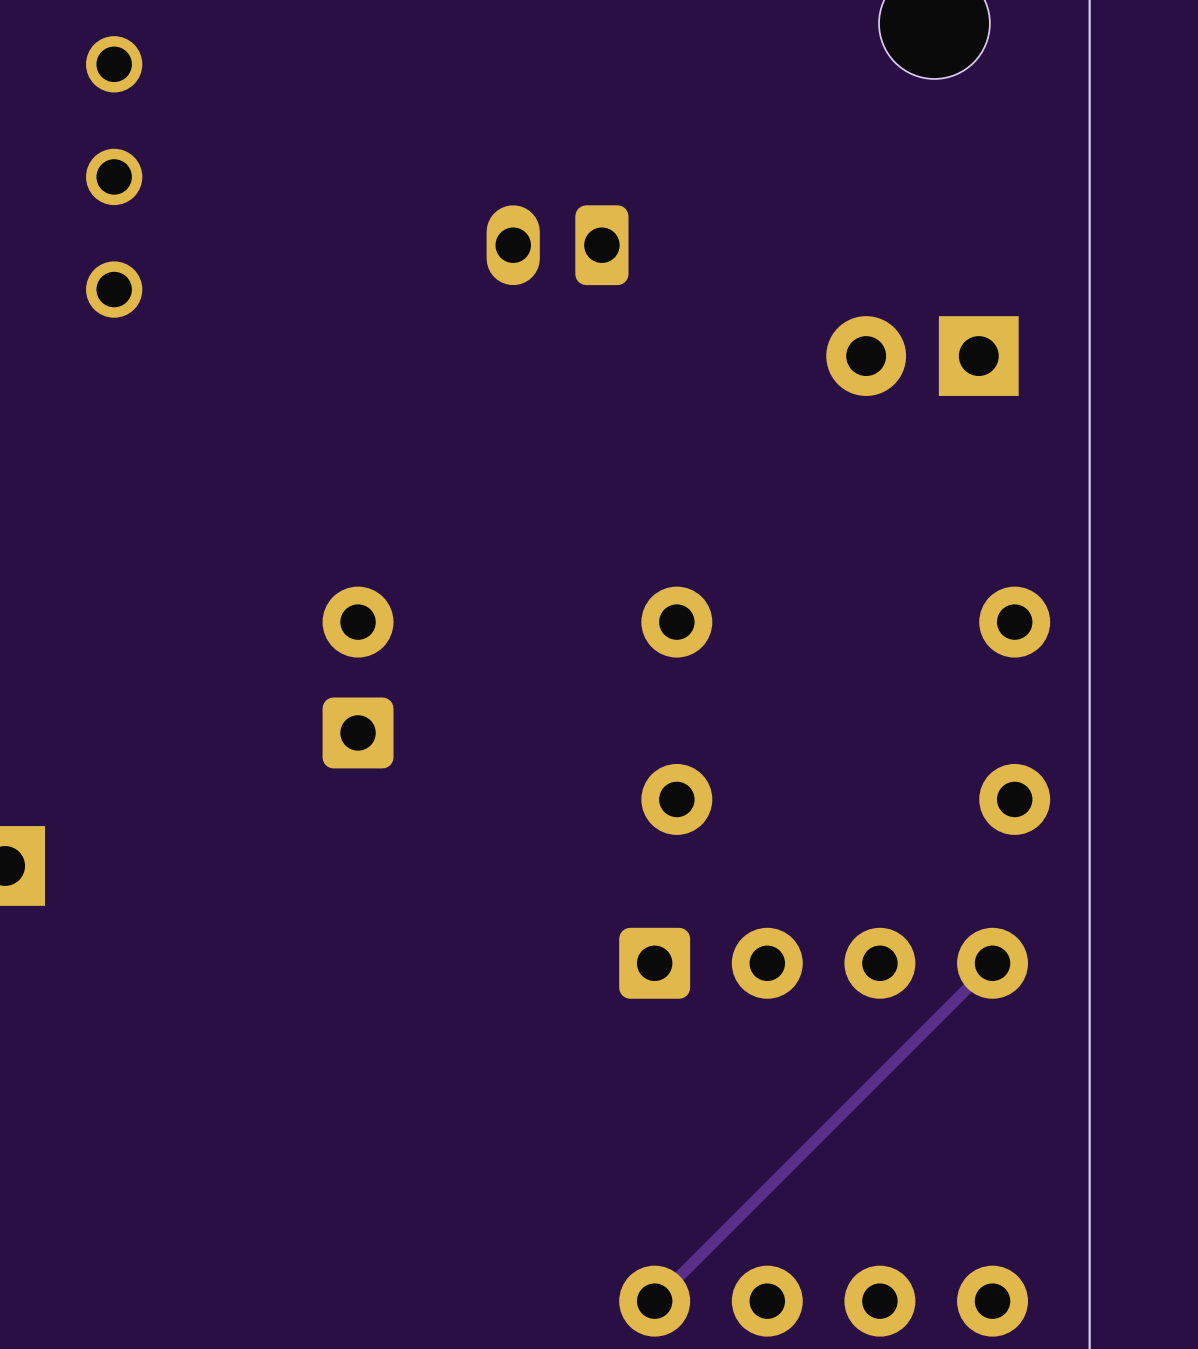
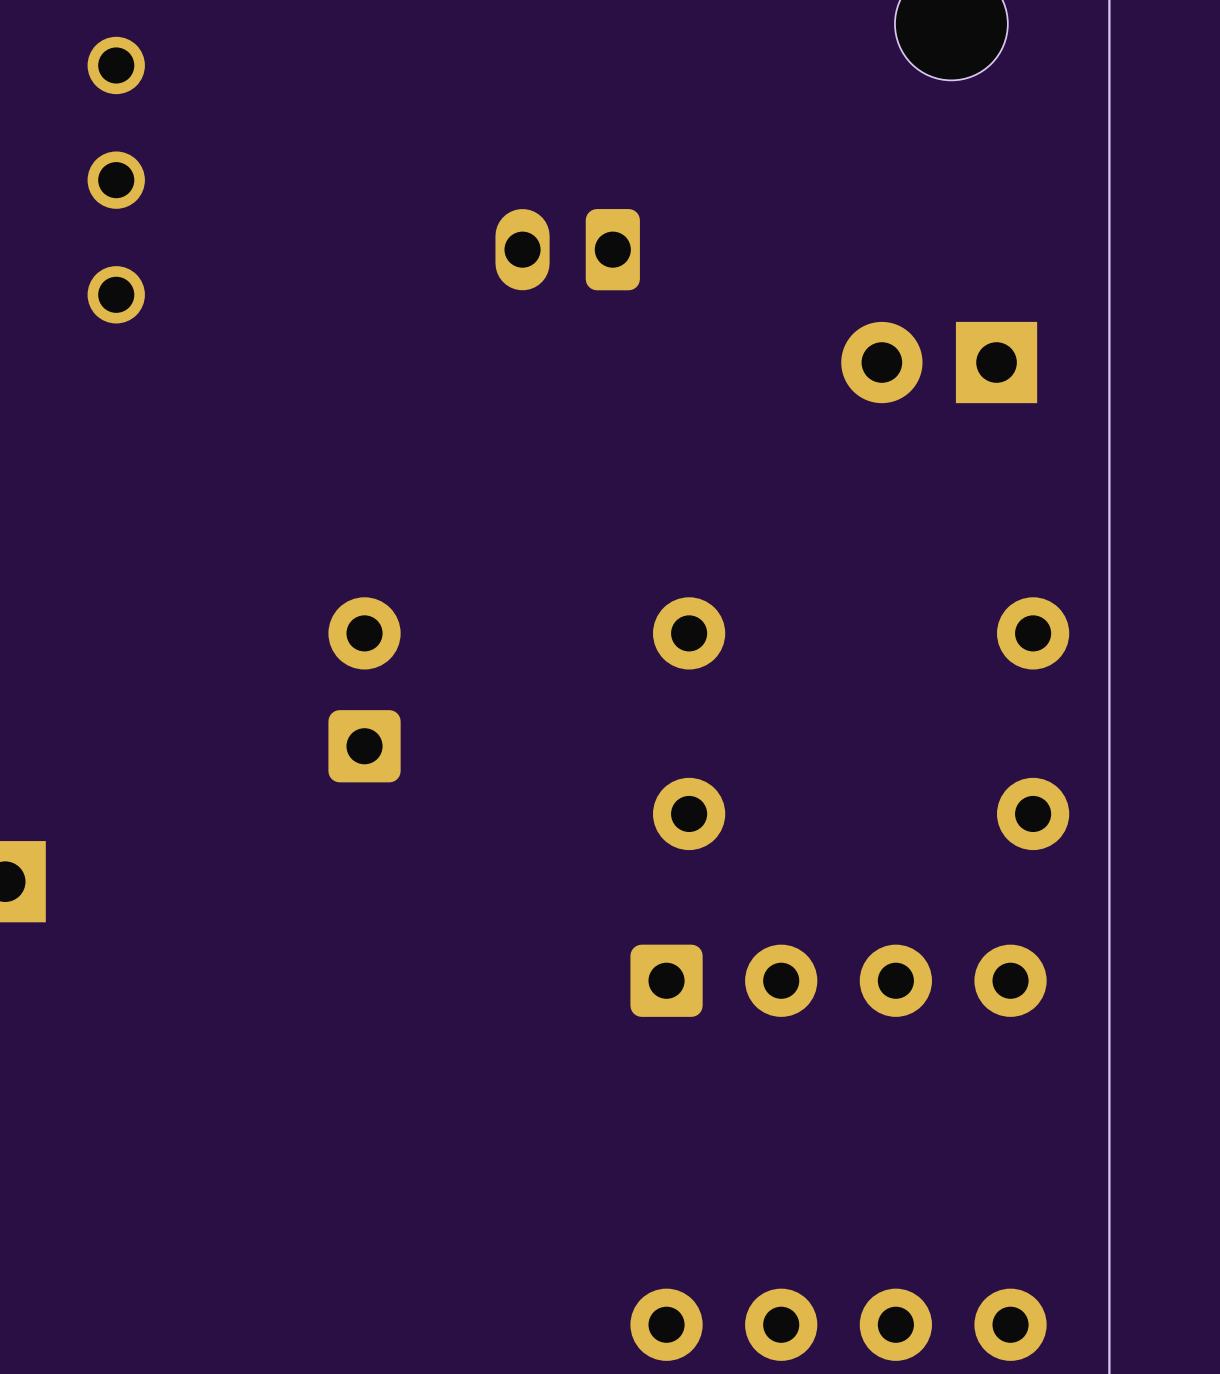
track: (992, 963) (654, 1301) -> none

